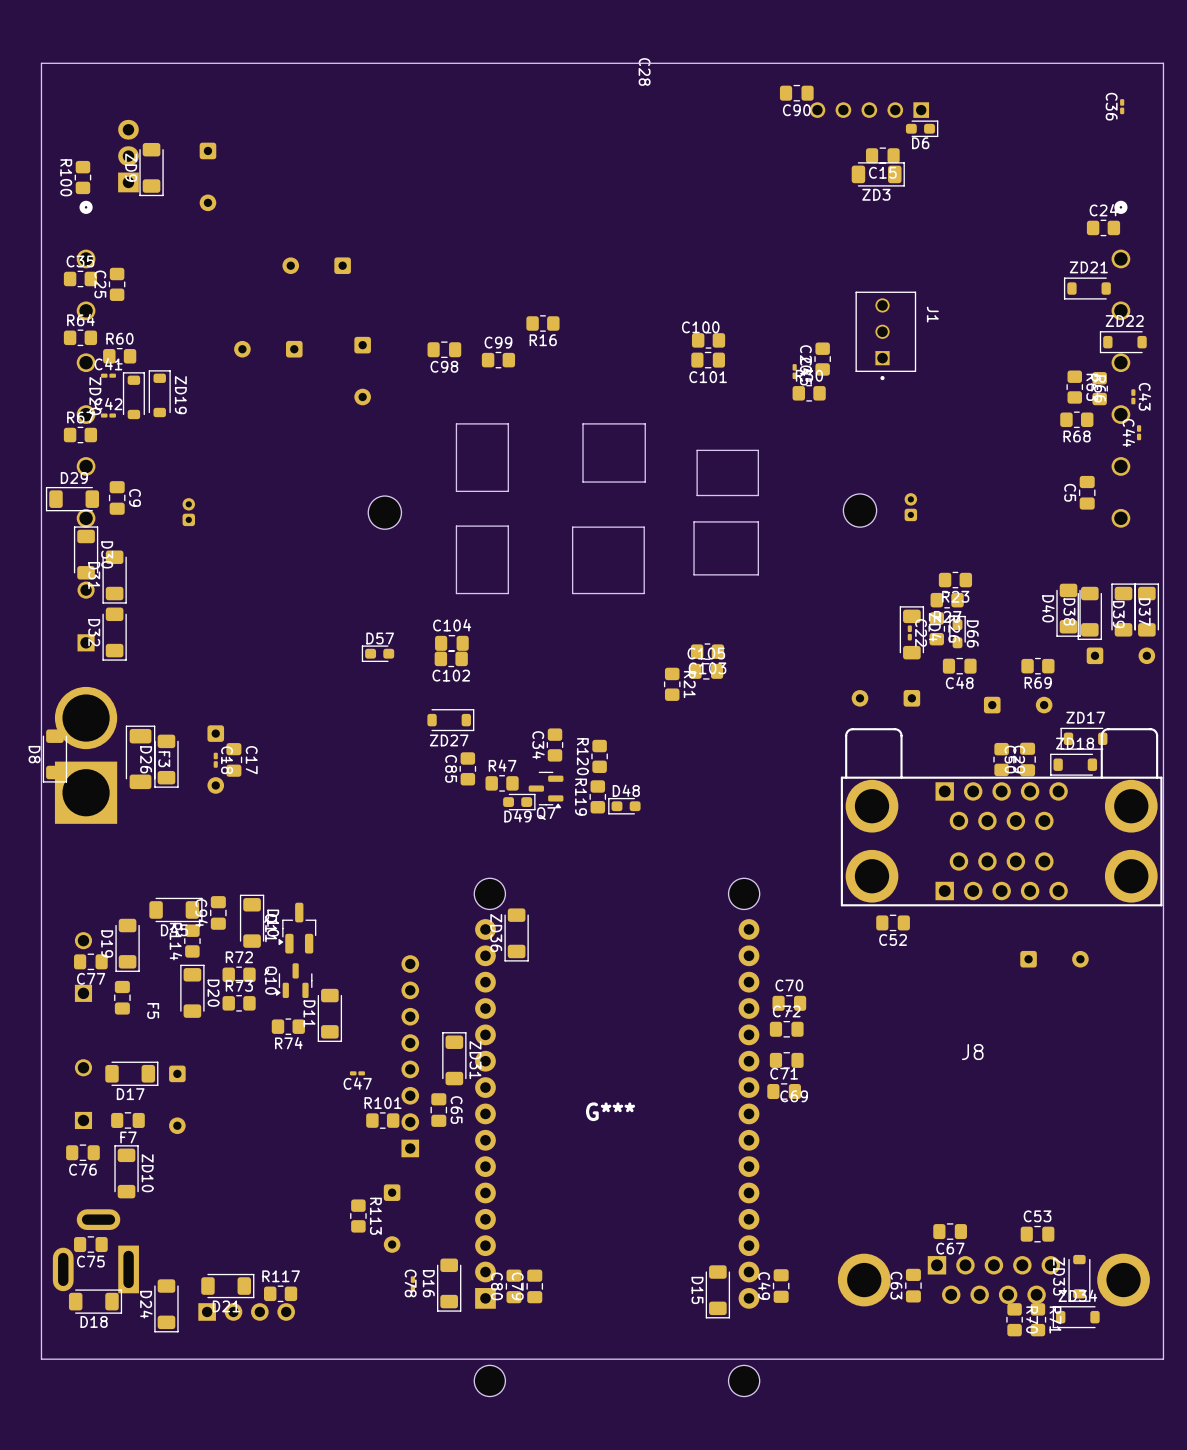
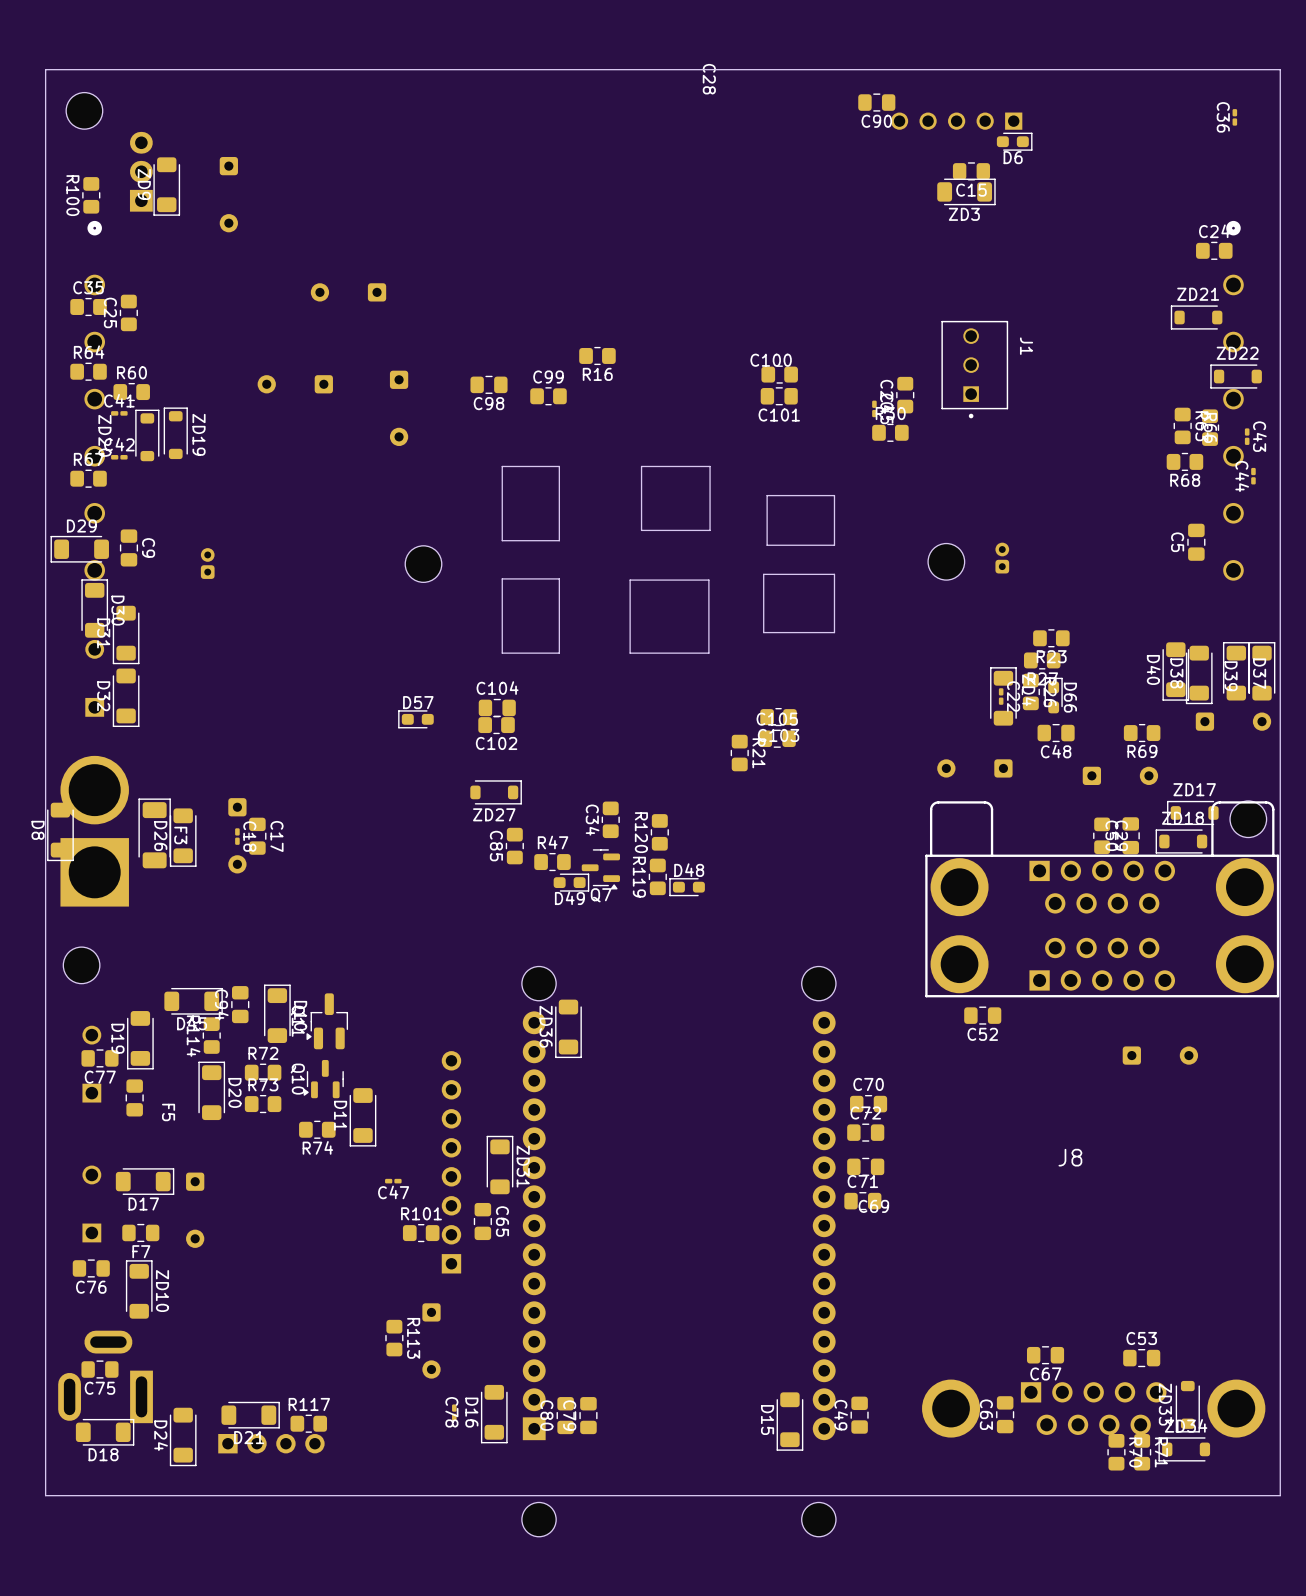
part: none -> (84, 110)
part: none -> (1248, 819)
part: none -> (81, 965)
G***: (610, 1111) -> none

